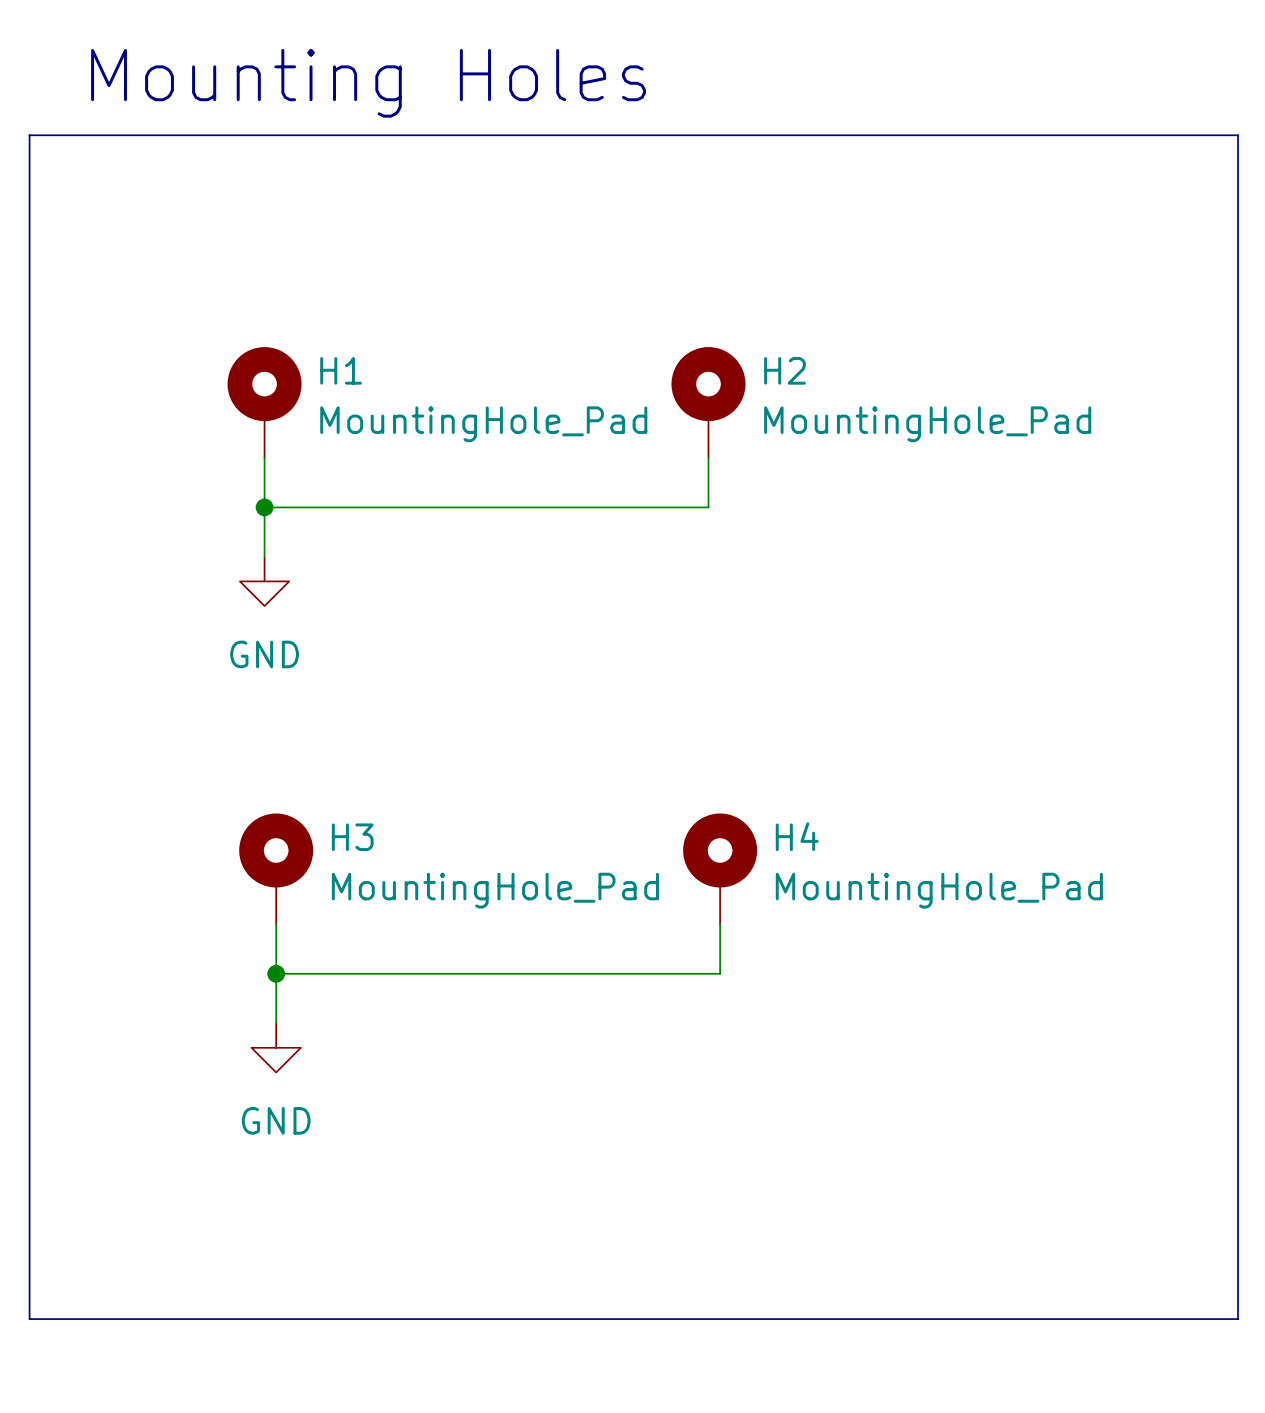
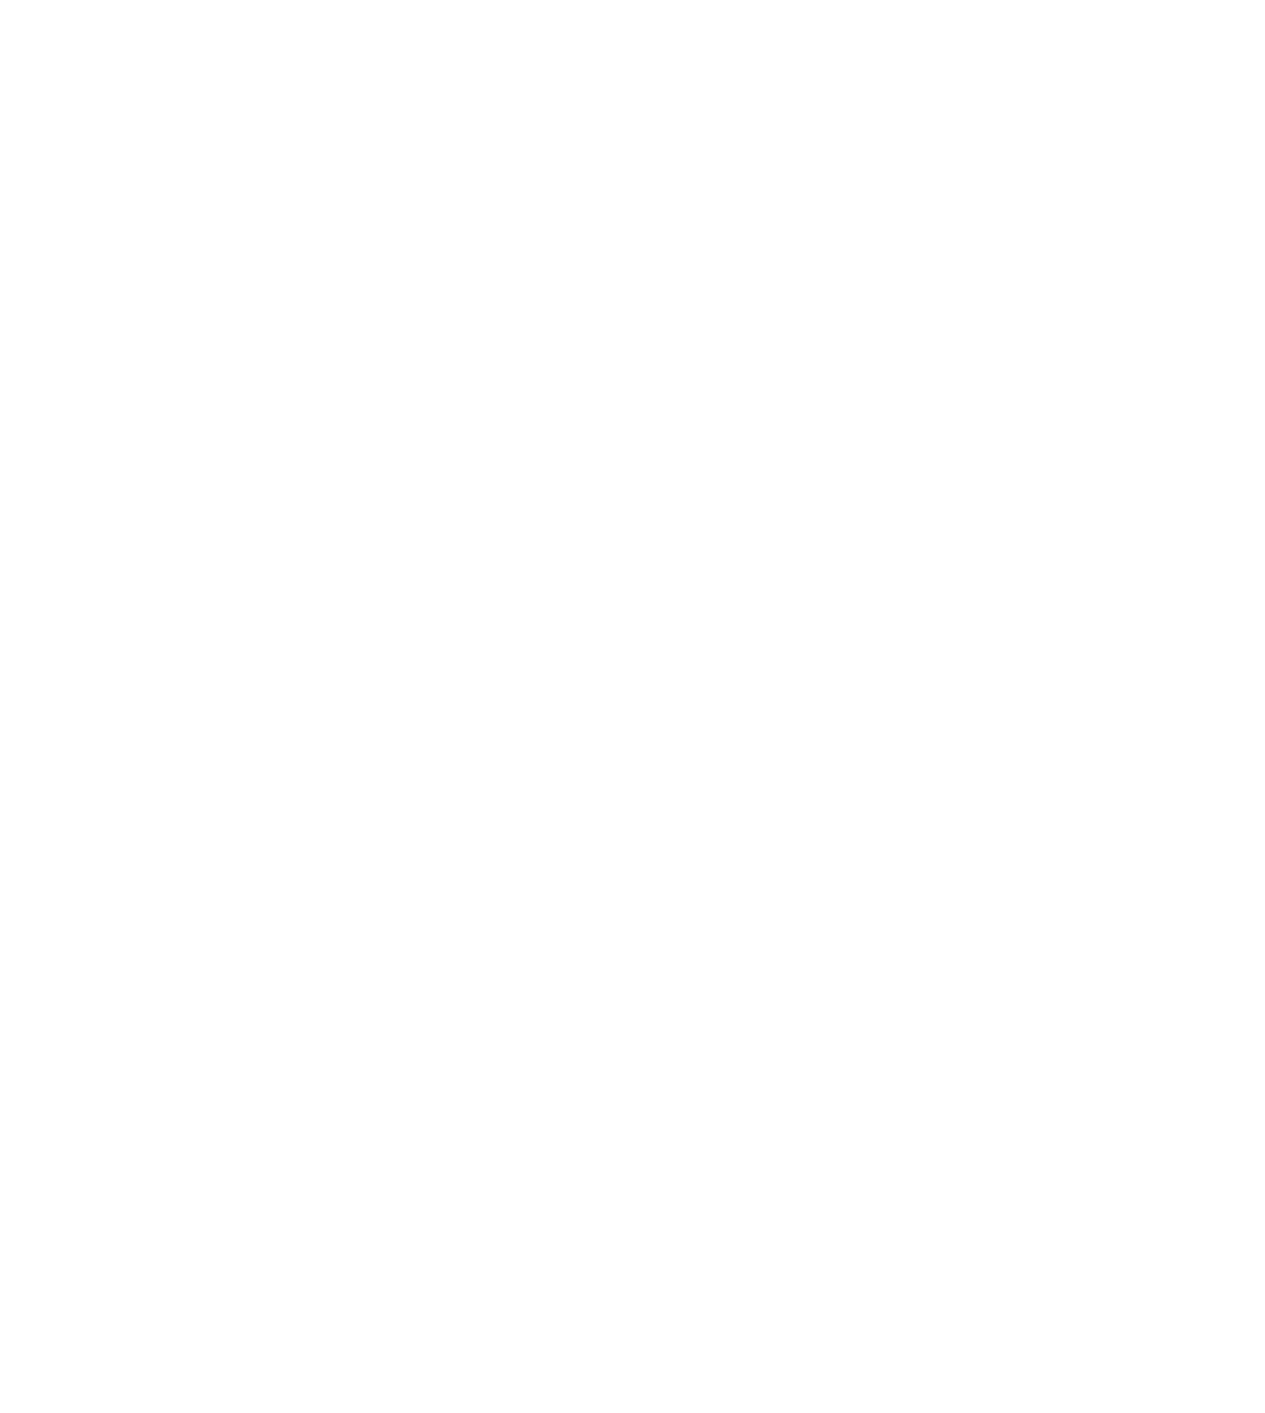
text: Mounting Holes (368, 83) -> none
line: (29, 135) (1238, 135) (1238, 1319) (29, 1319) (29, 135) -> none
H1: MountingHole_Pad (264, 402) -> none
H2: MountingHole_Pad (708, 402) -> none
wire: (264, 458) (264, 556) -> none
wire: (708, 458) (708, 507) (264, 507) -> none
junction: (264, 507) -> none
power symbol: GND (264, 581) -> none
H3: MountingHole_Pad (276, 868) -> none
H4: MountingHole_Pad (720, 868) -> none
wire: (276, 924) (276, 1023) -> none
wire: (720, 924) (720, 973) (276, 973) -> none
junction: (276, 973) -> none
power symbol: GND (276, 1047) -> none

